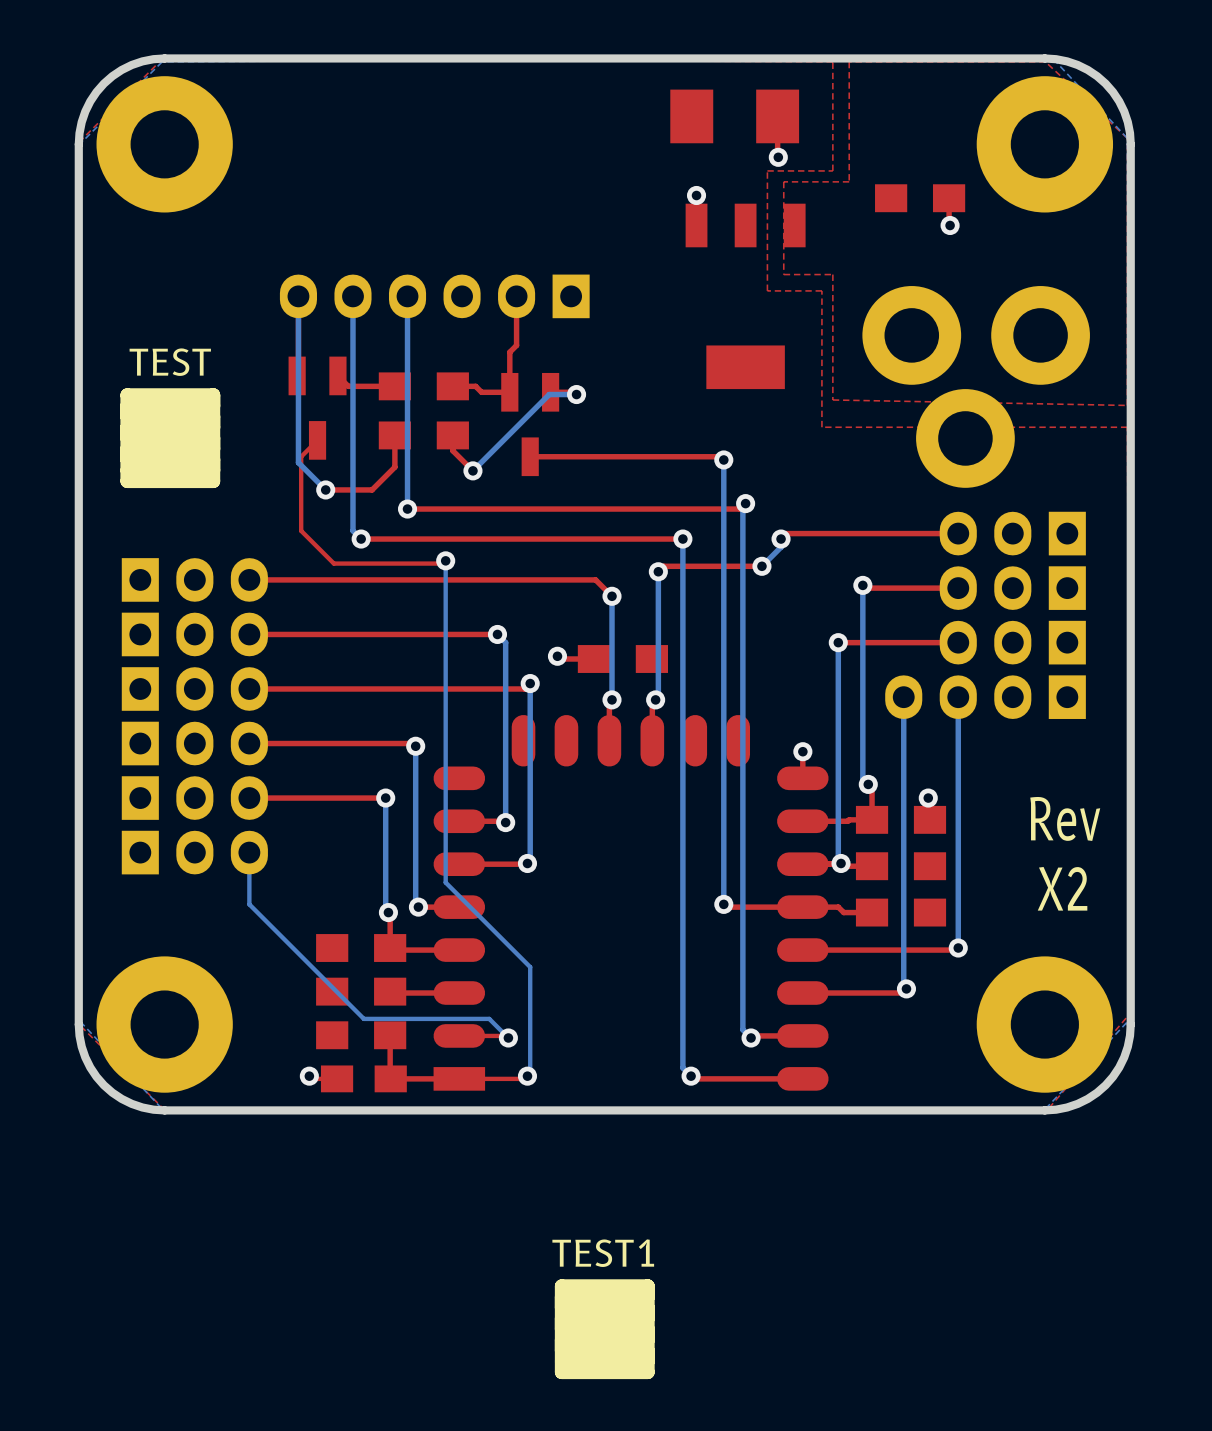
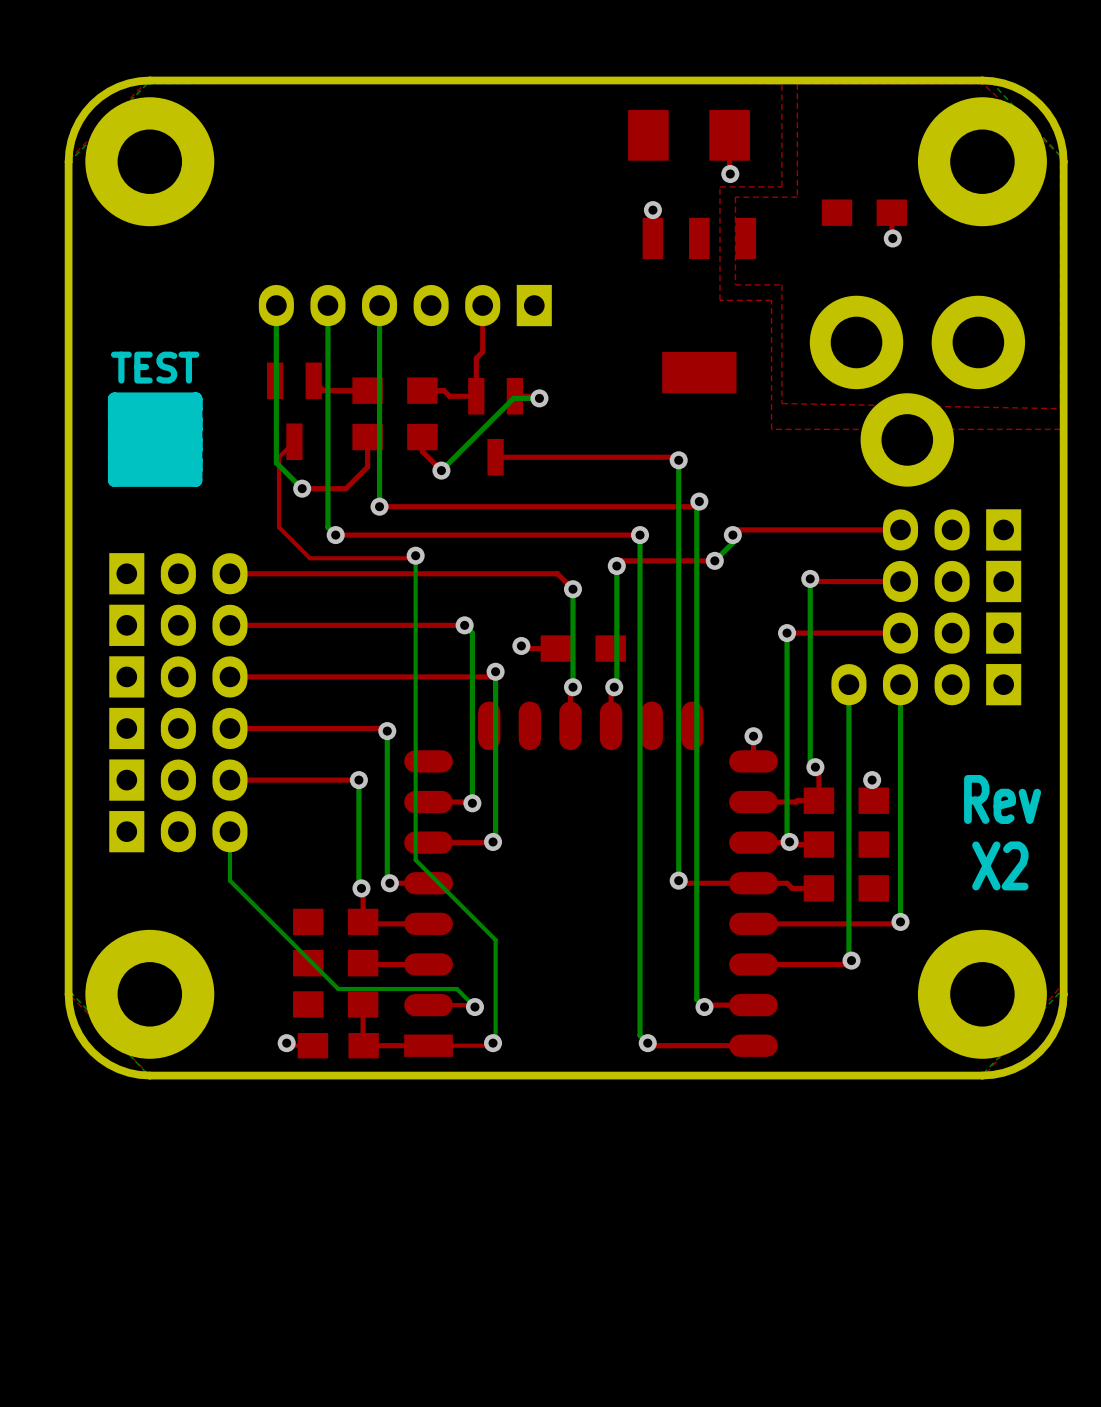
TEST1: (604, 1329) -> none

